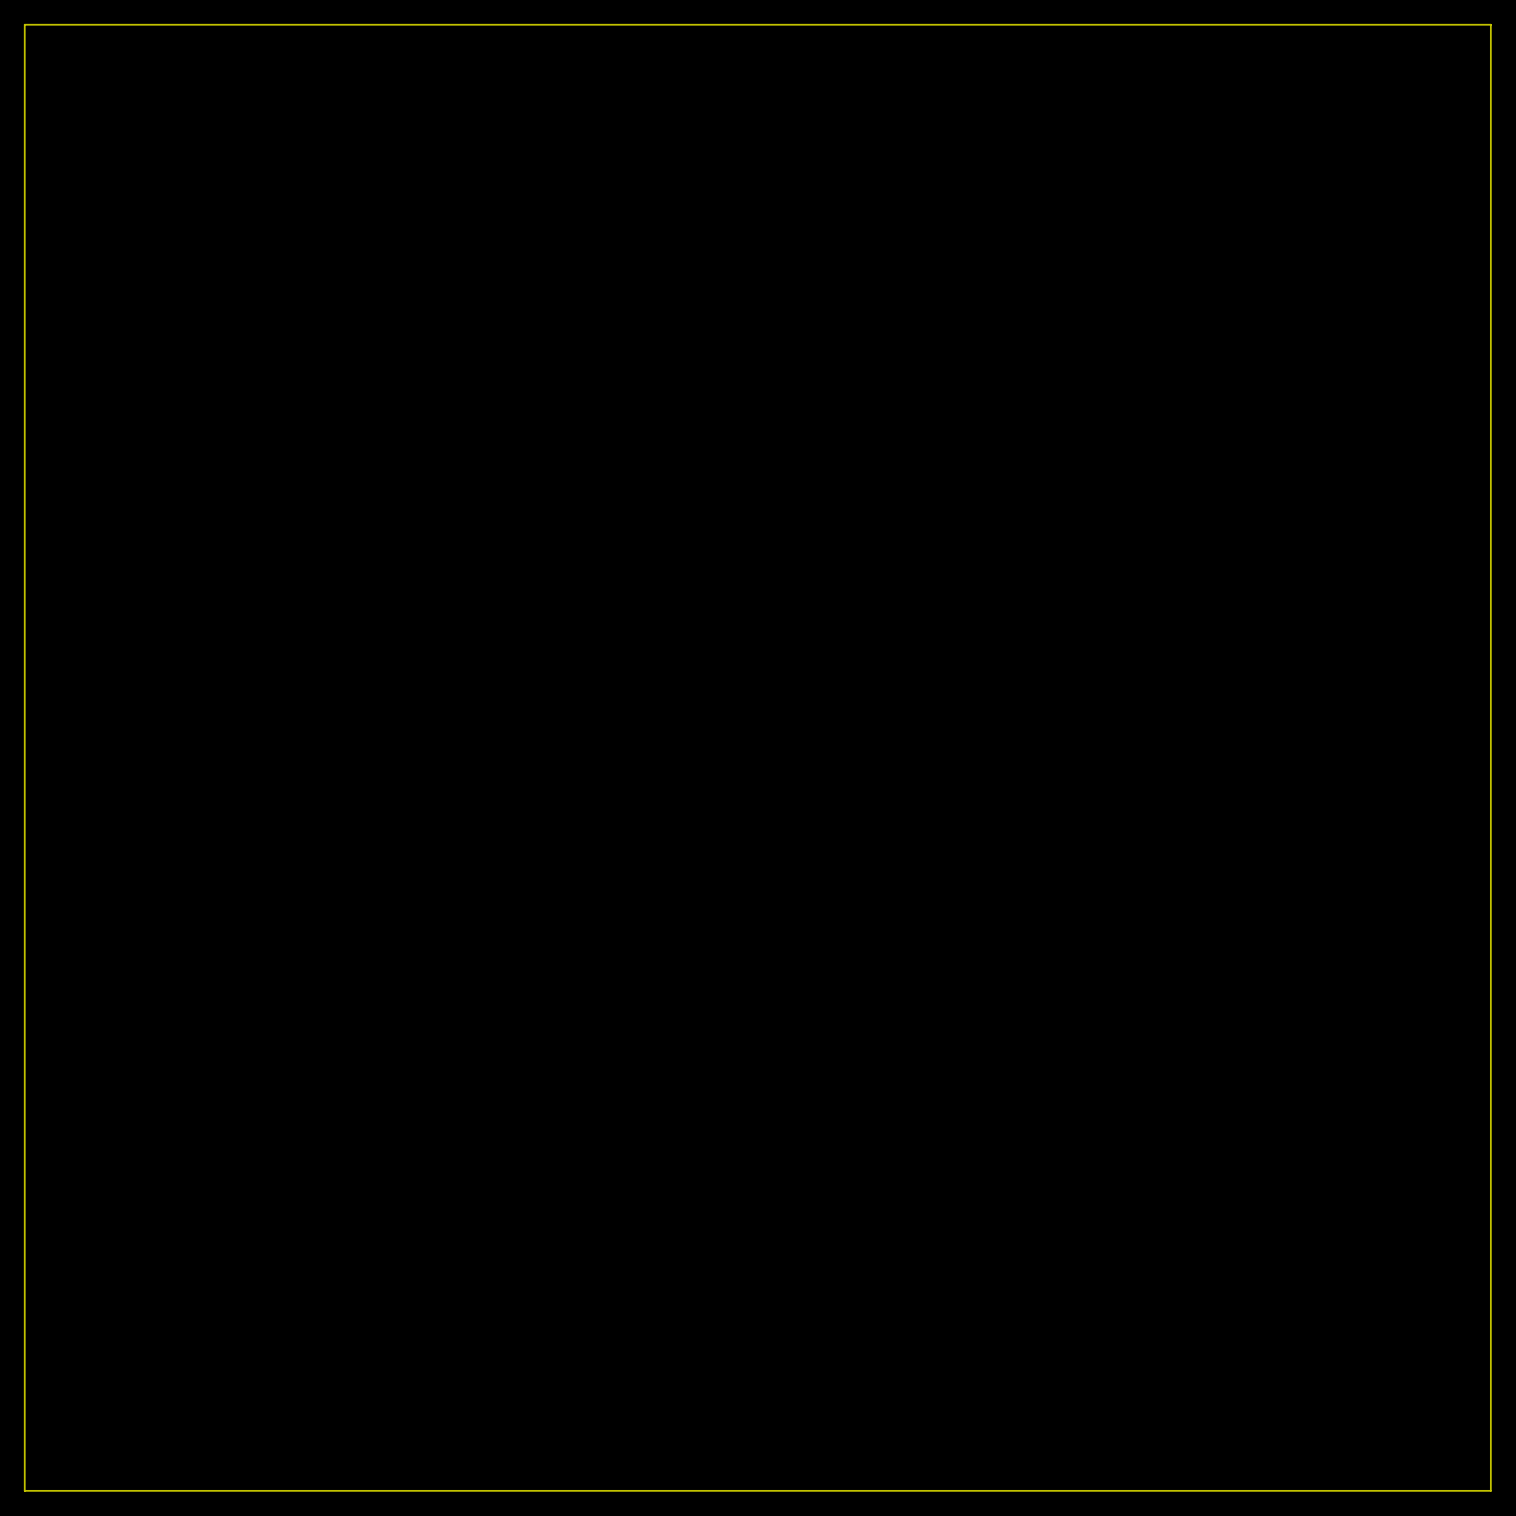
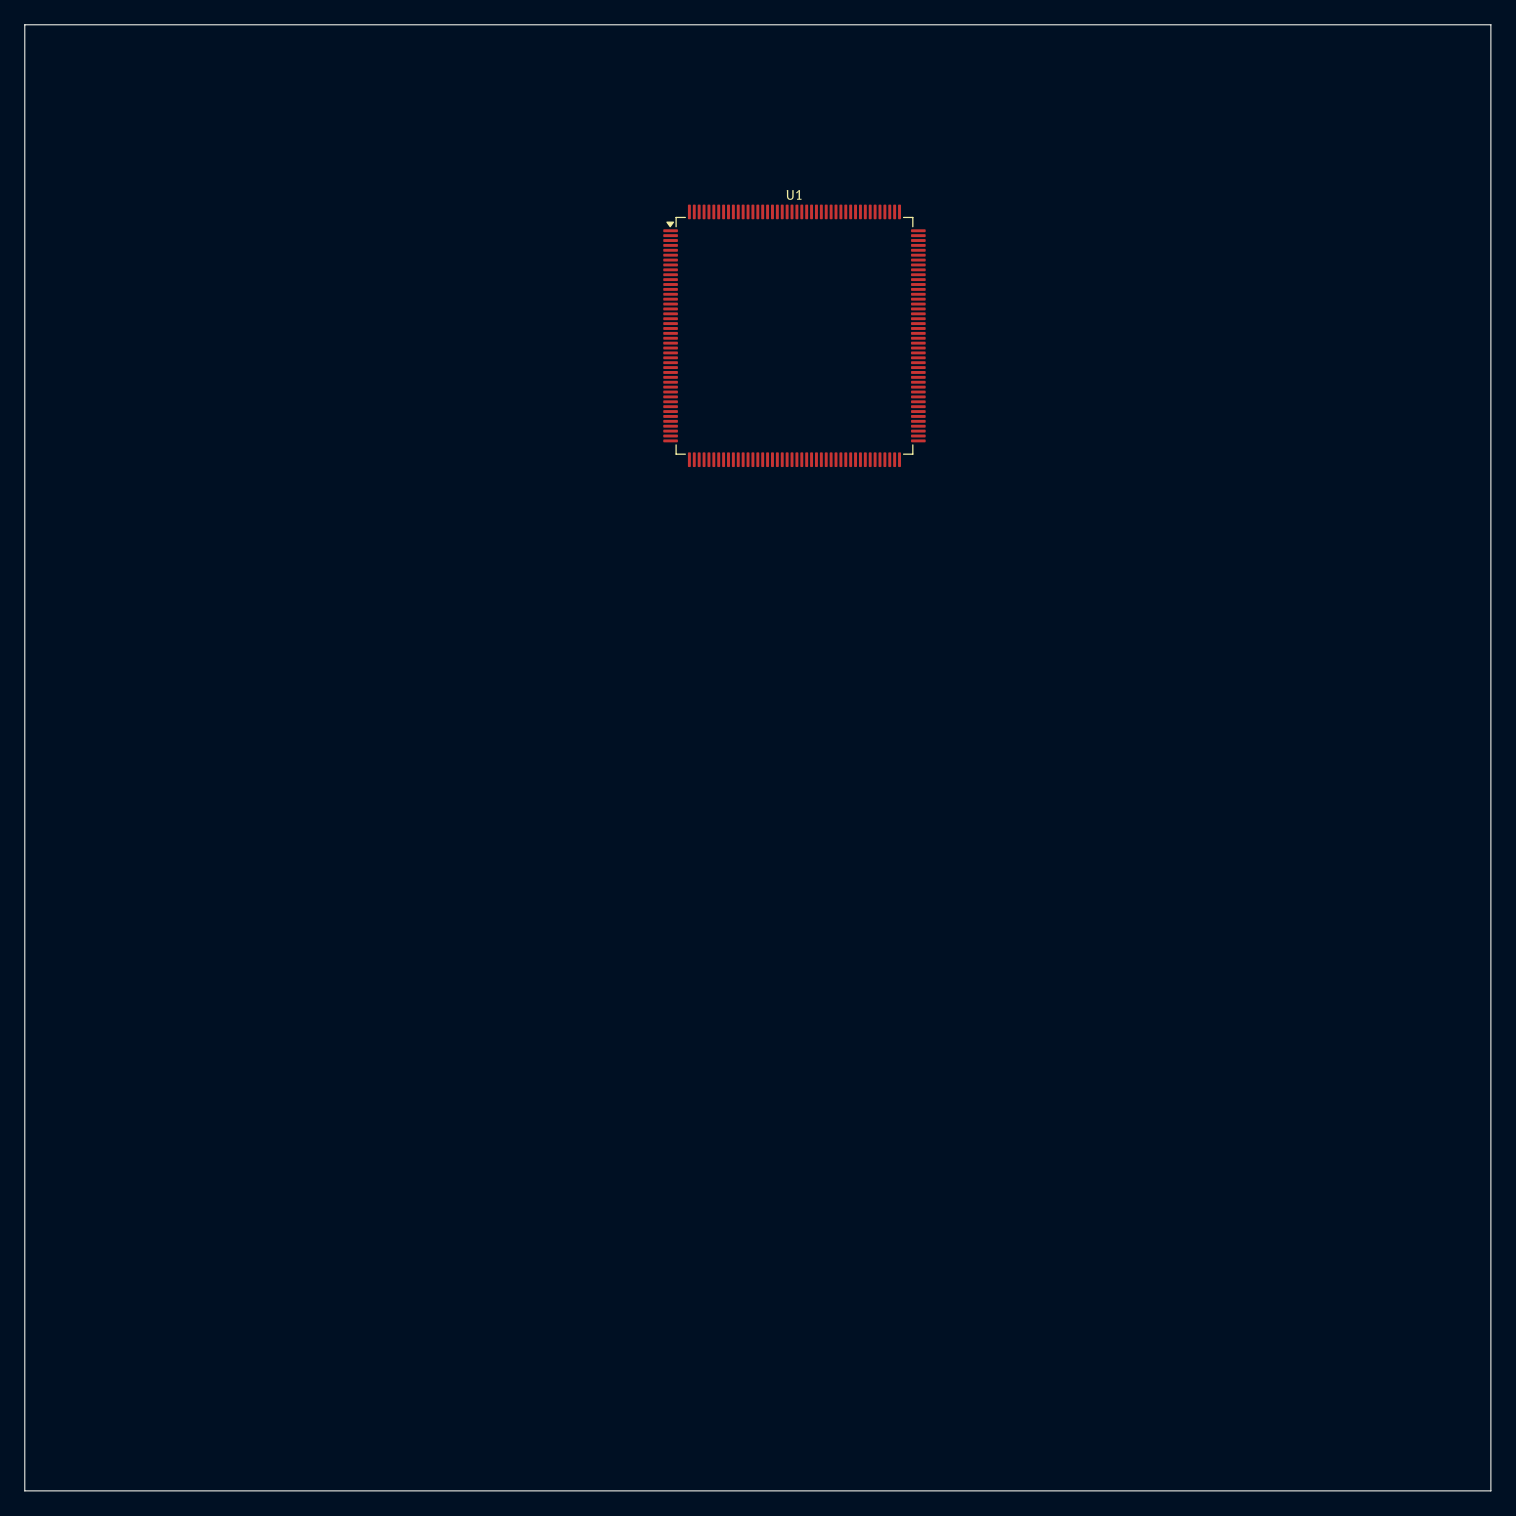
U1: none -> (794, 335)

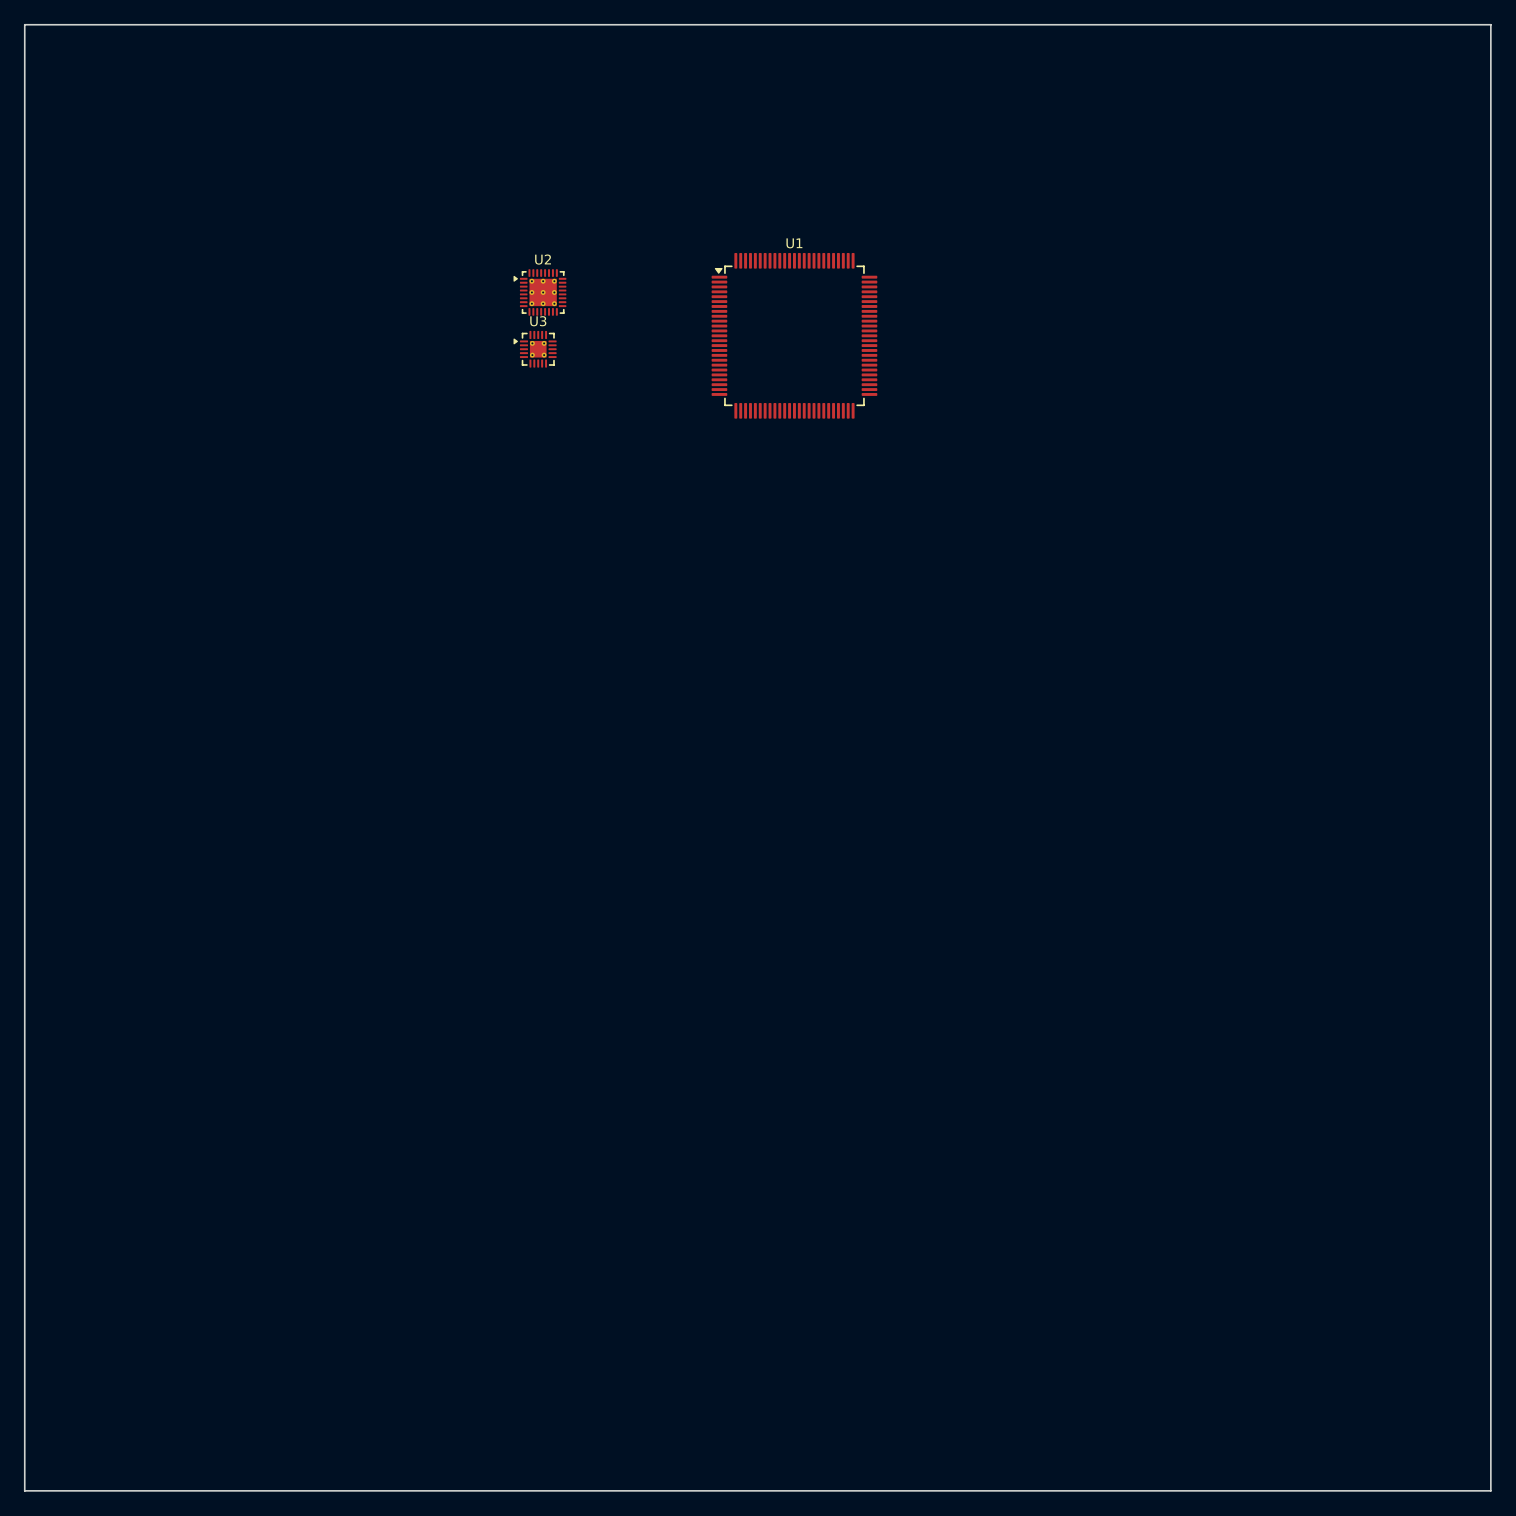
U1 name position: U1 (794, 194) -> U1 (794, 243)
U1 footprint: [663, 204, 926, 468] -> [711, 252, 878, 419]
U2: none -> (539, 292)
U3: none -> (535, 349)

